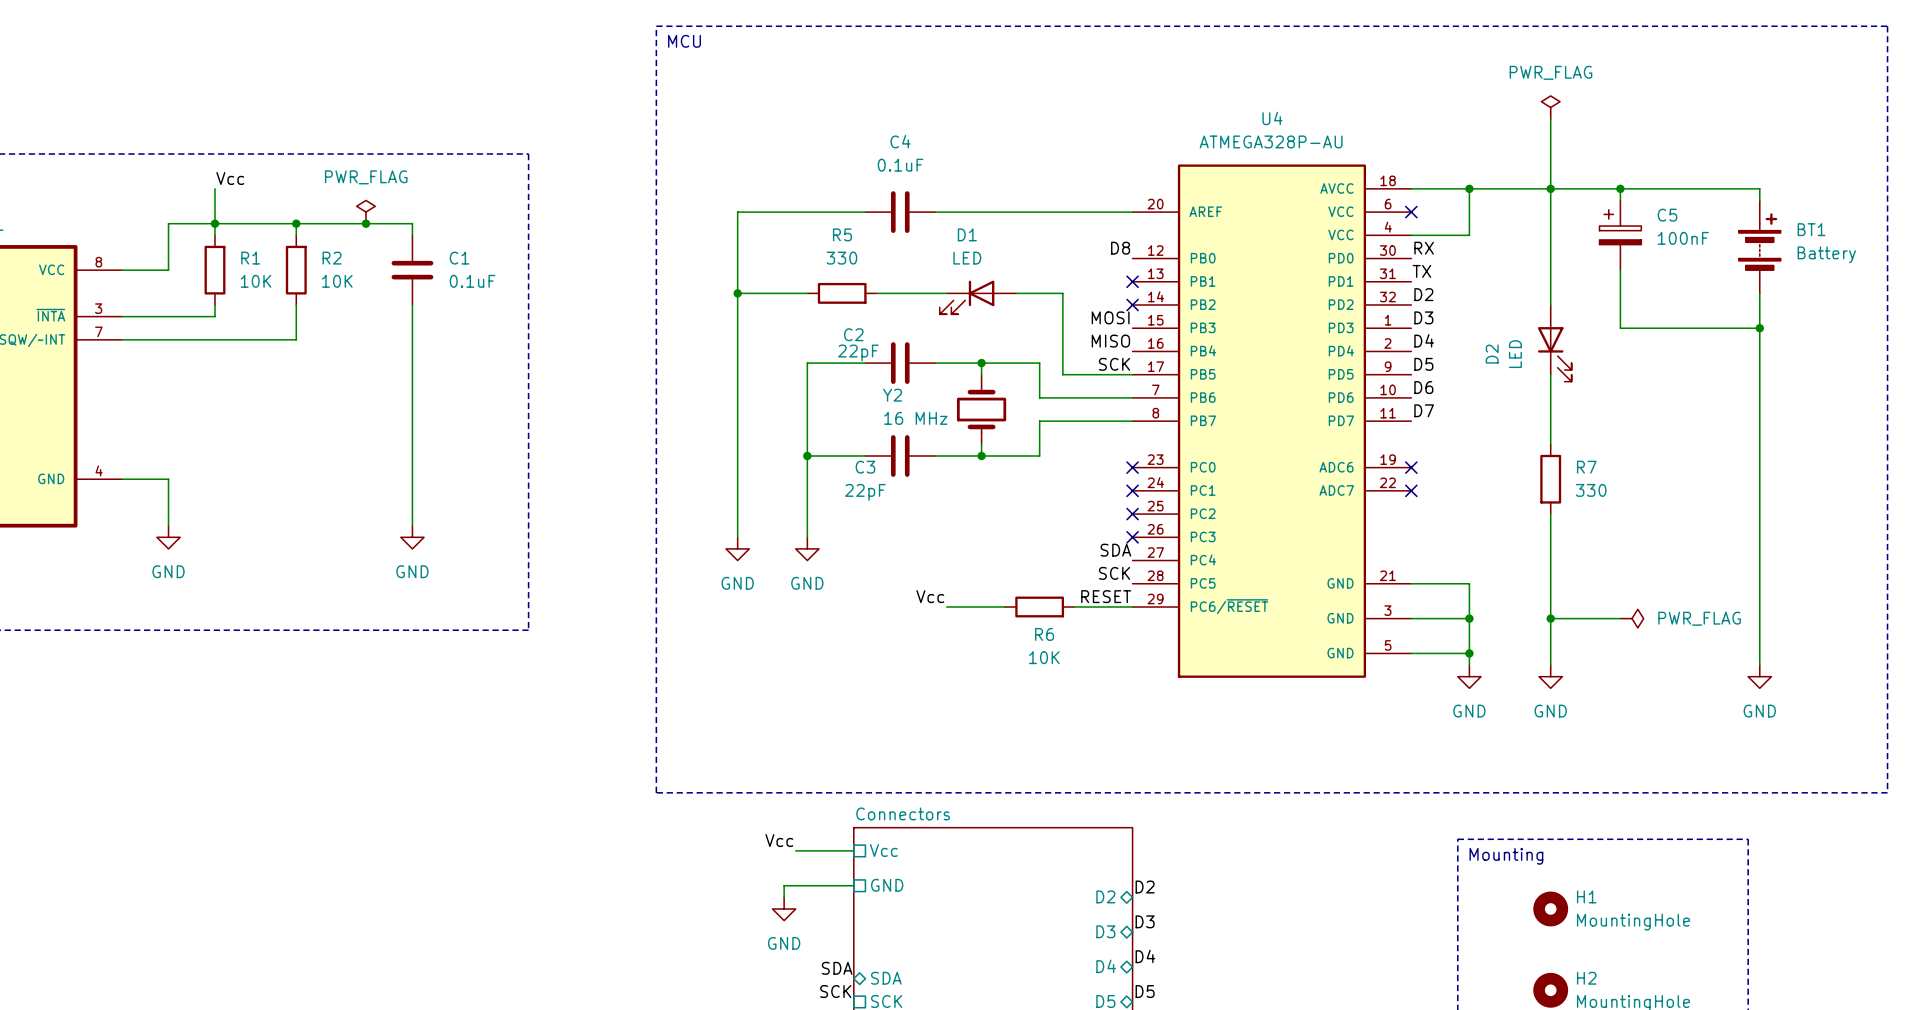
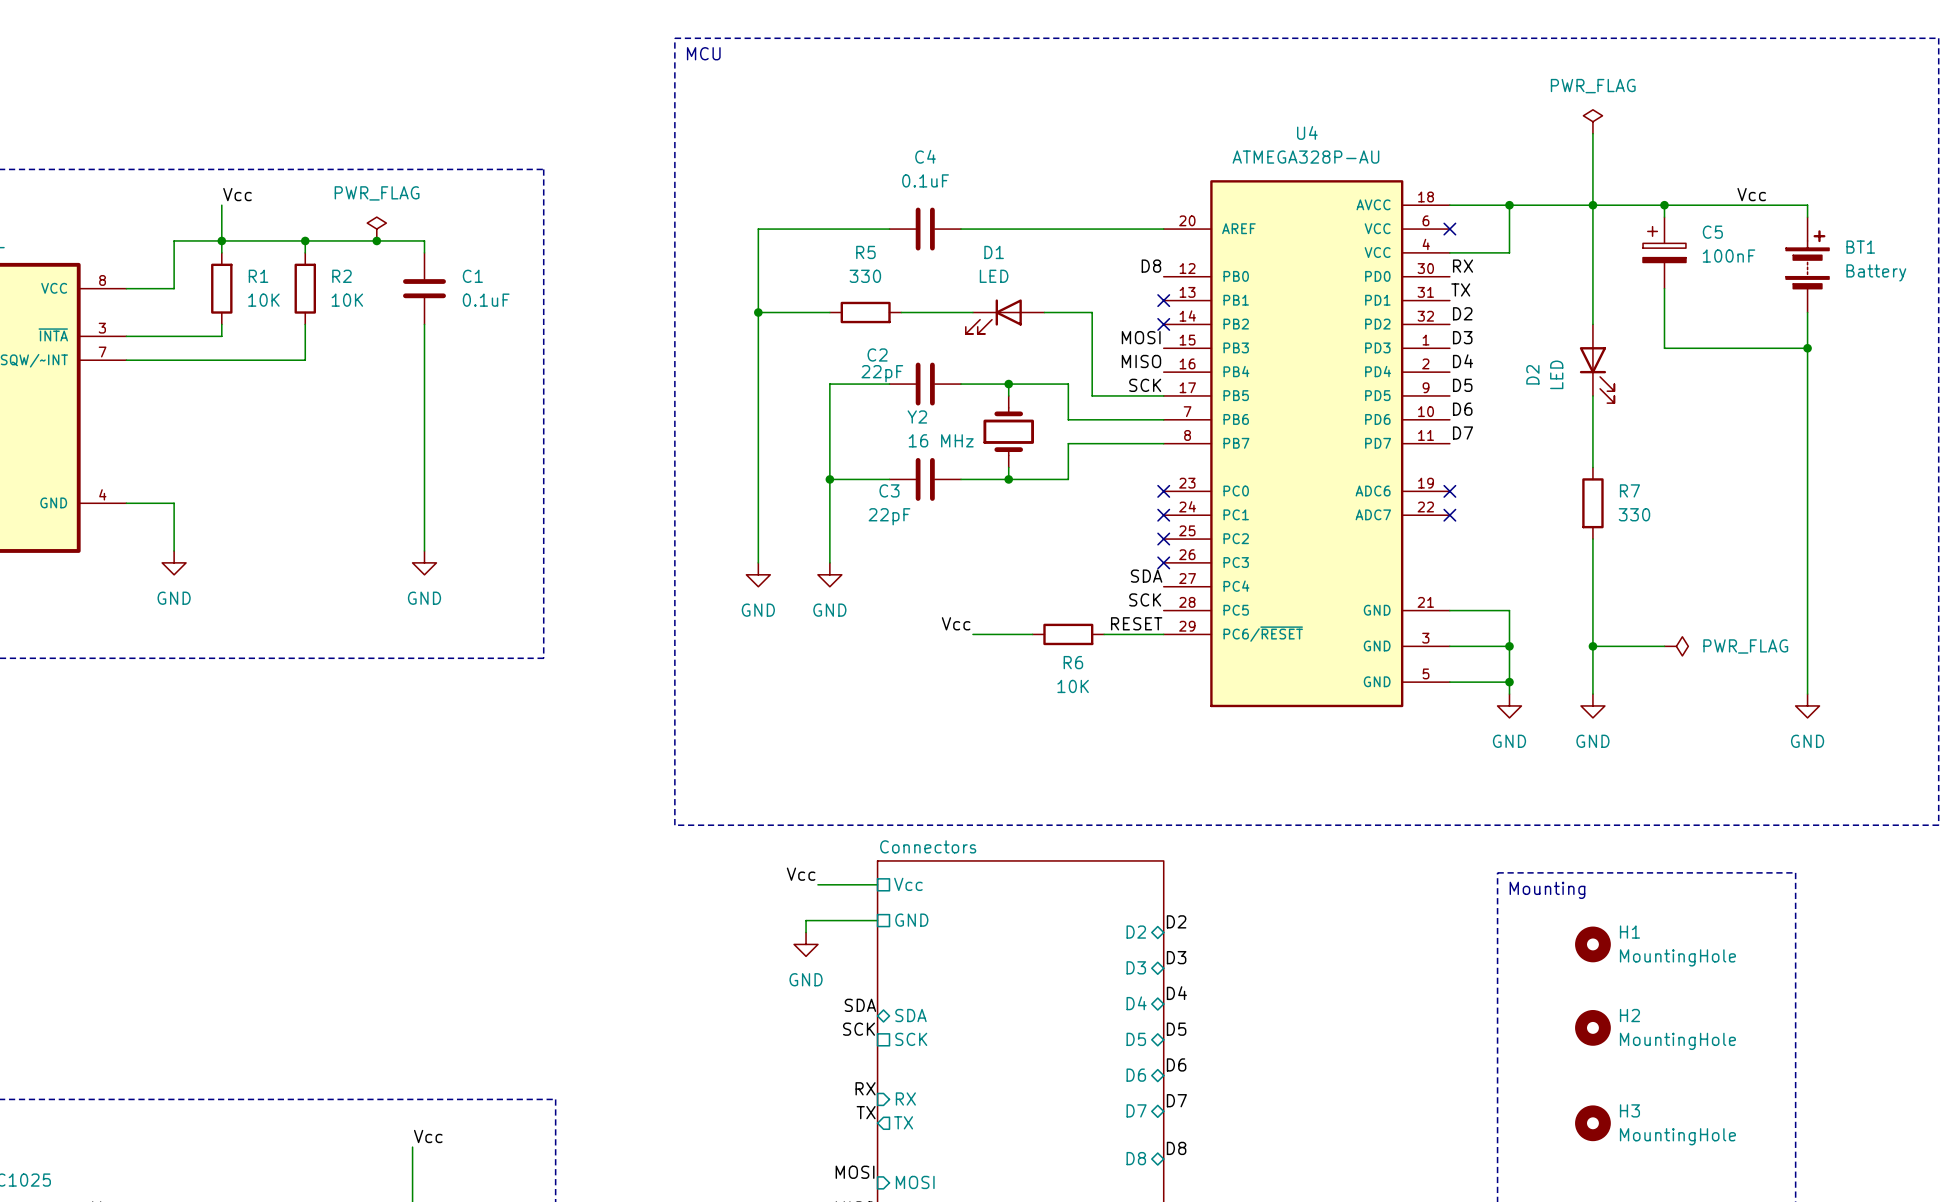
label: none -> Vcc (1751, 194)

